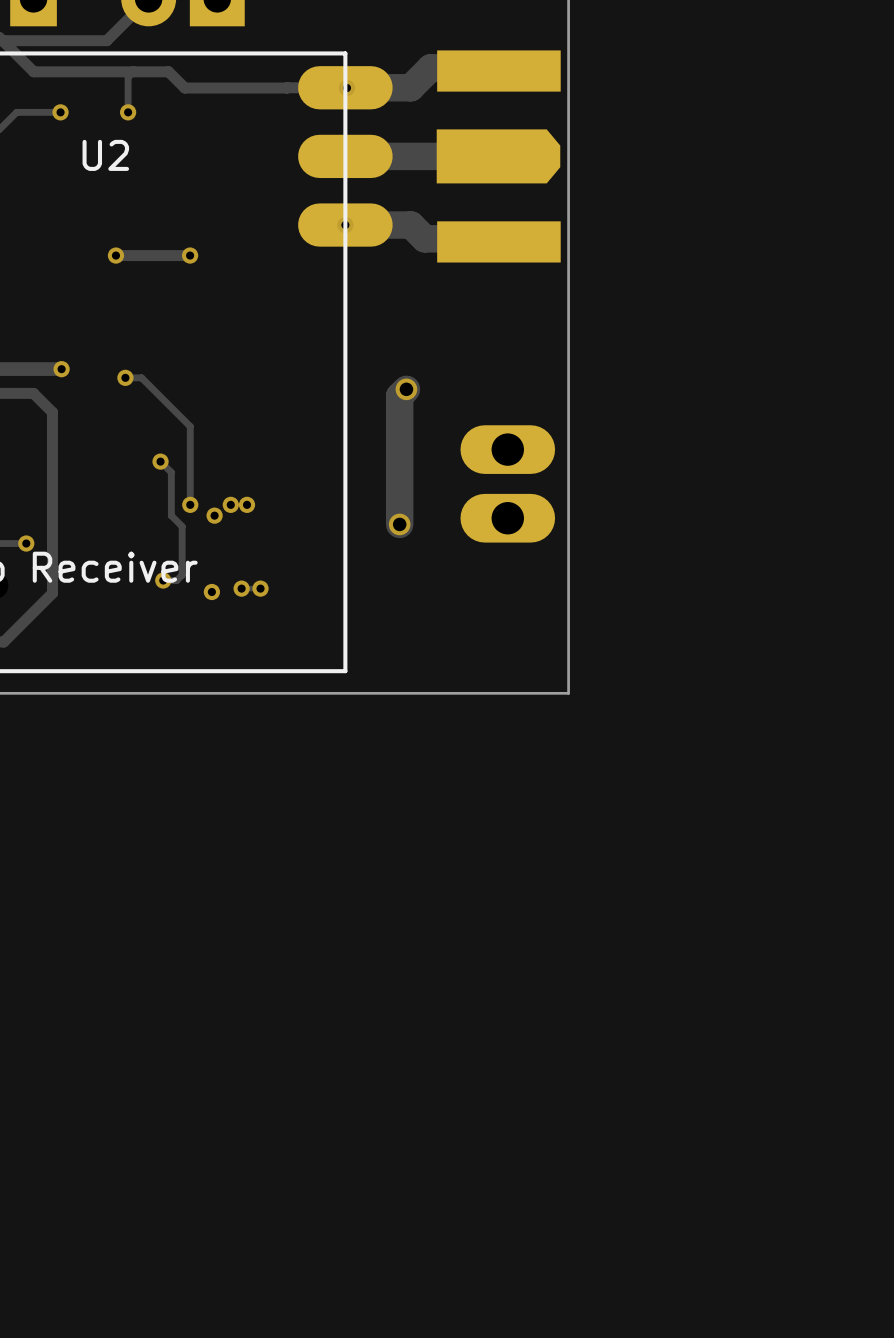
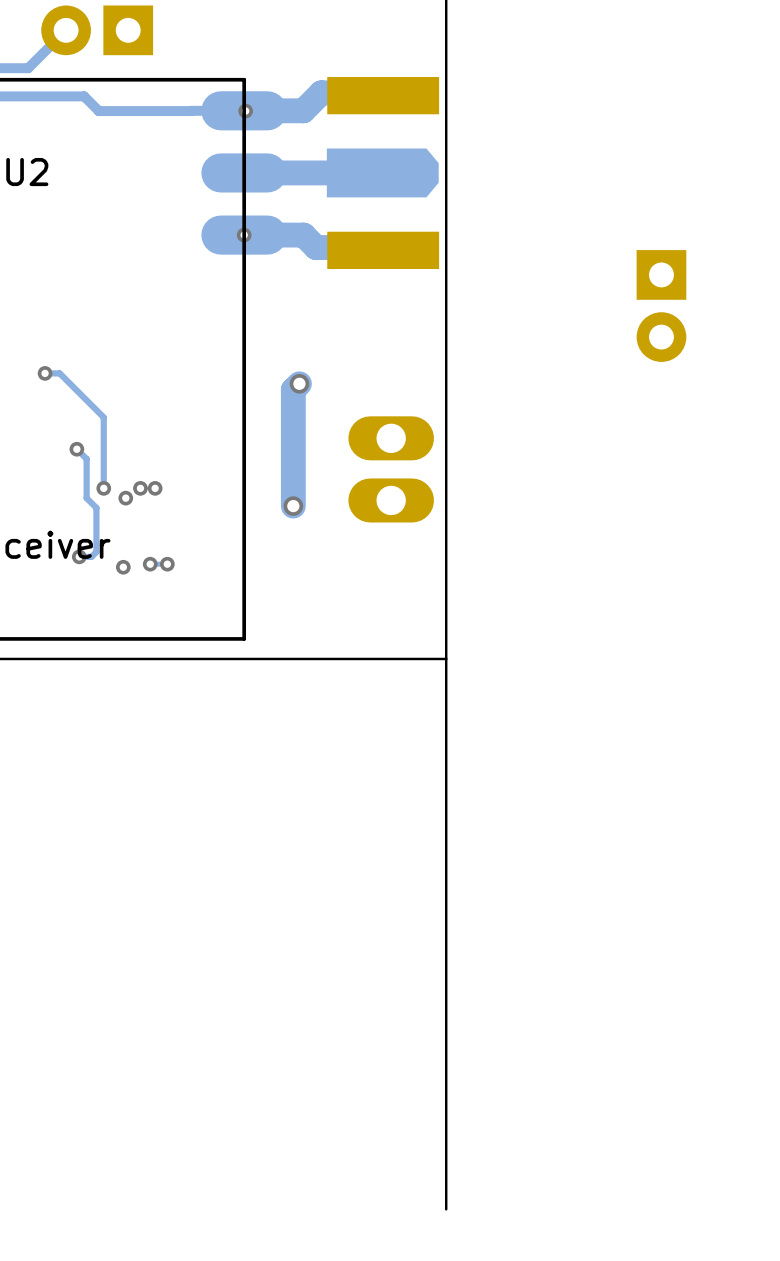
track: (133, 71) (128, 77) (128, 112) -> none
via: (128, 112) -> none
via: (115, 255) -> none
track: (190, 255) (115, 255) -> none
via: (190, 255) -> none
part: none -> (661, 306)
board edge: none -> (446, 658) (446, 1209)

